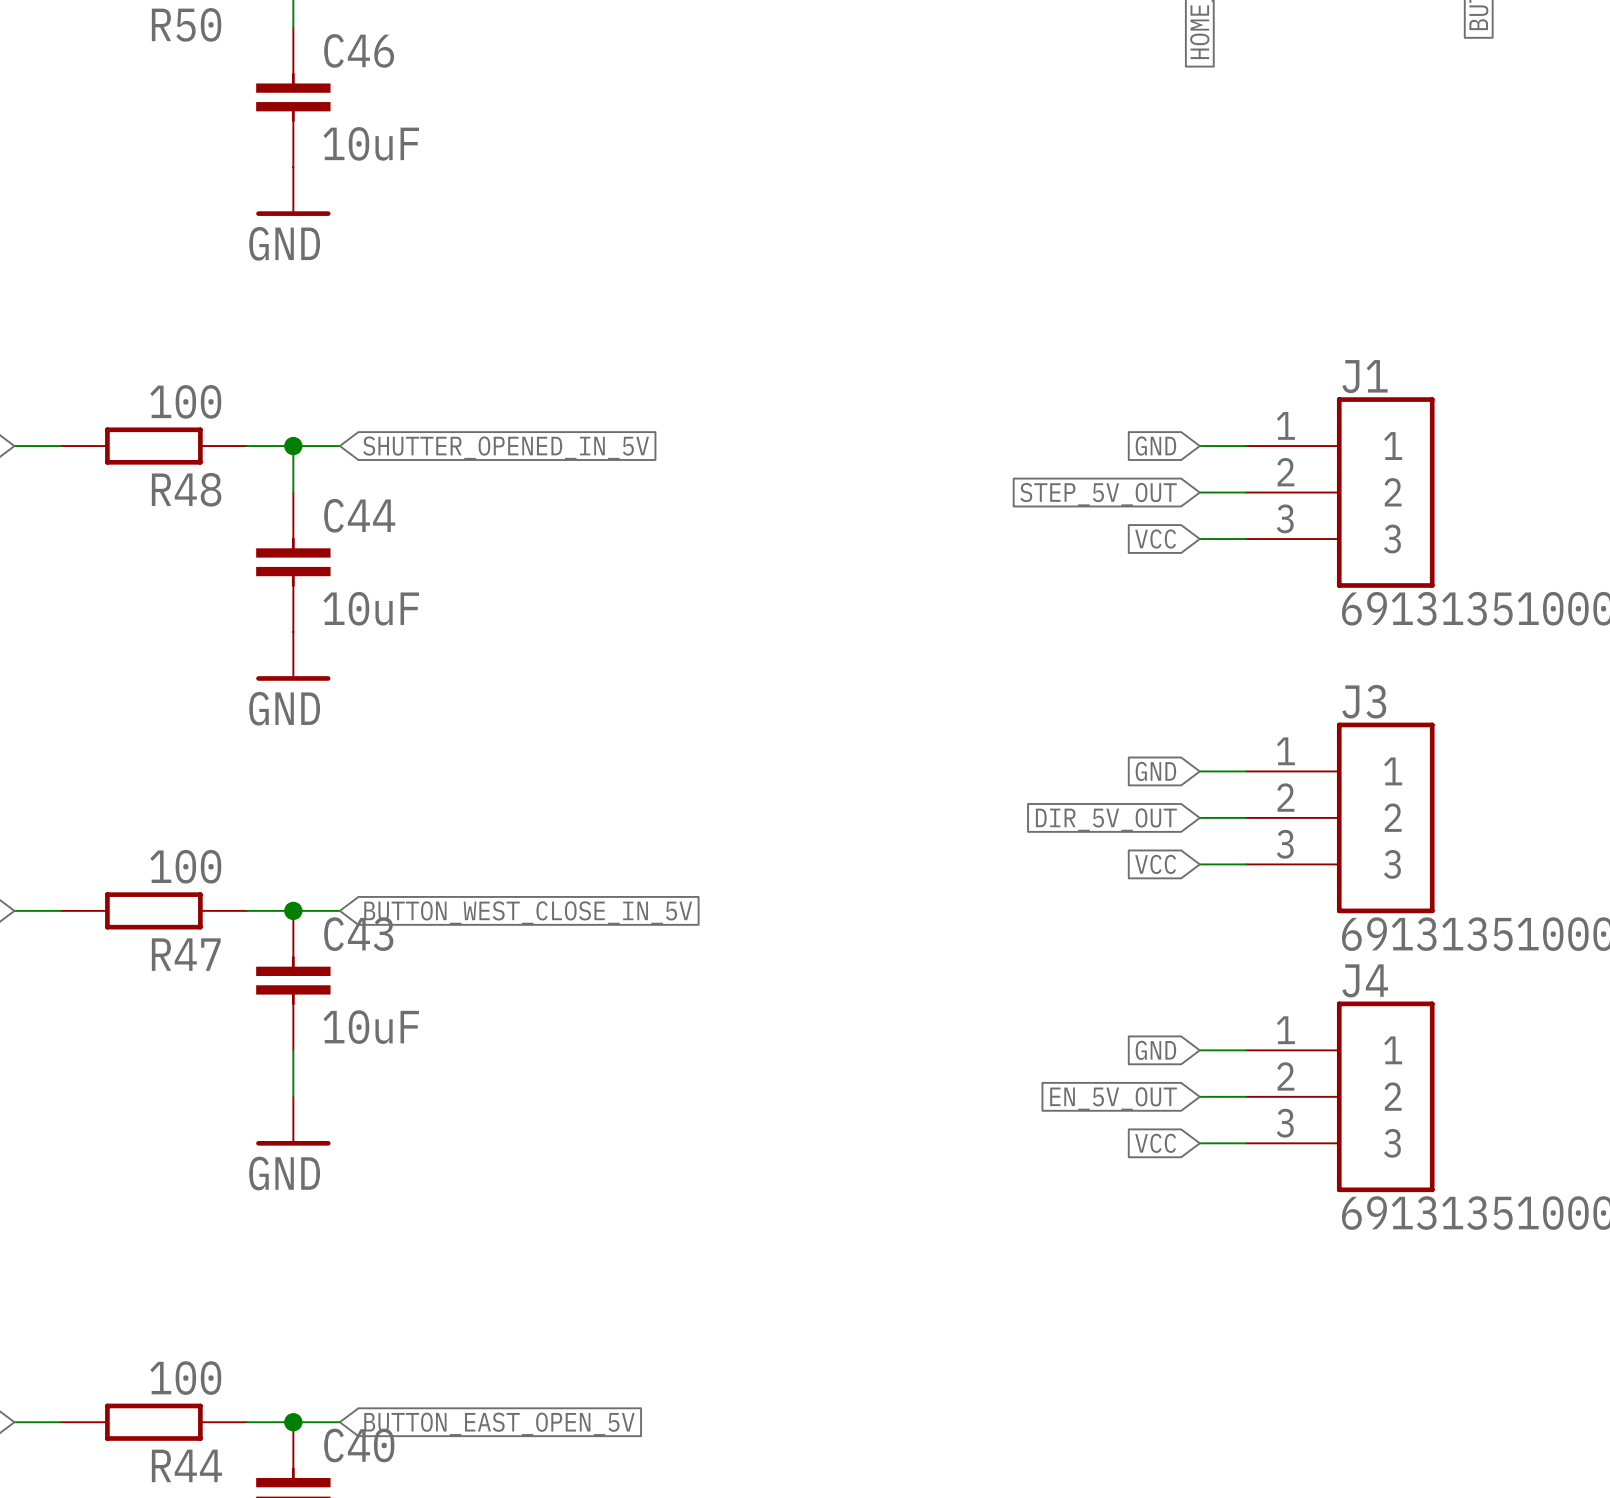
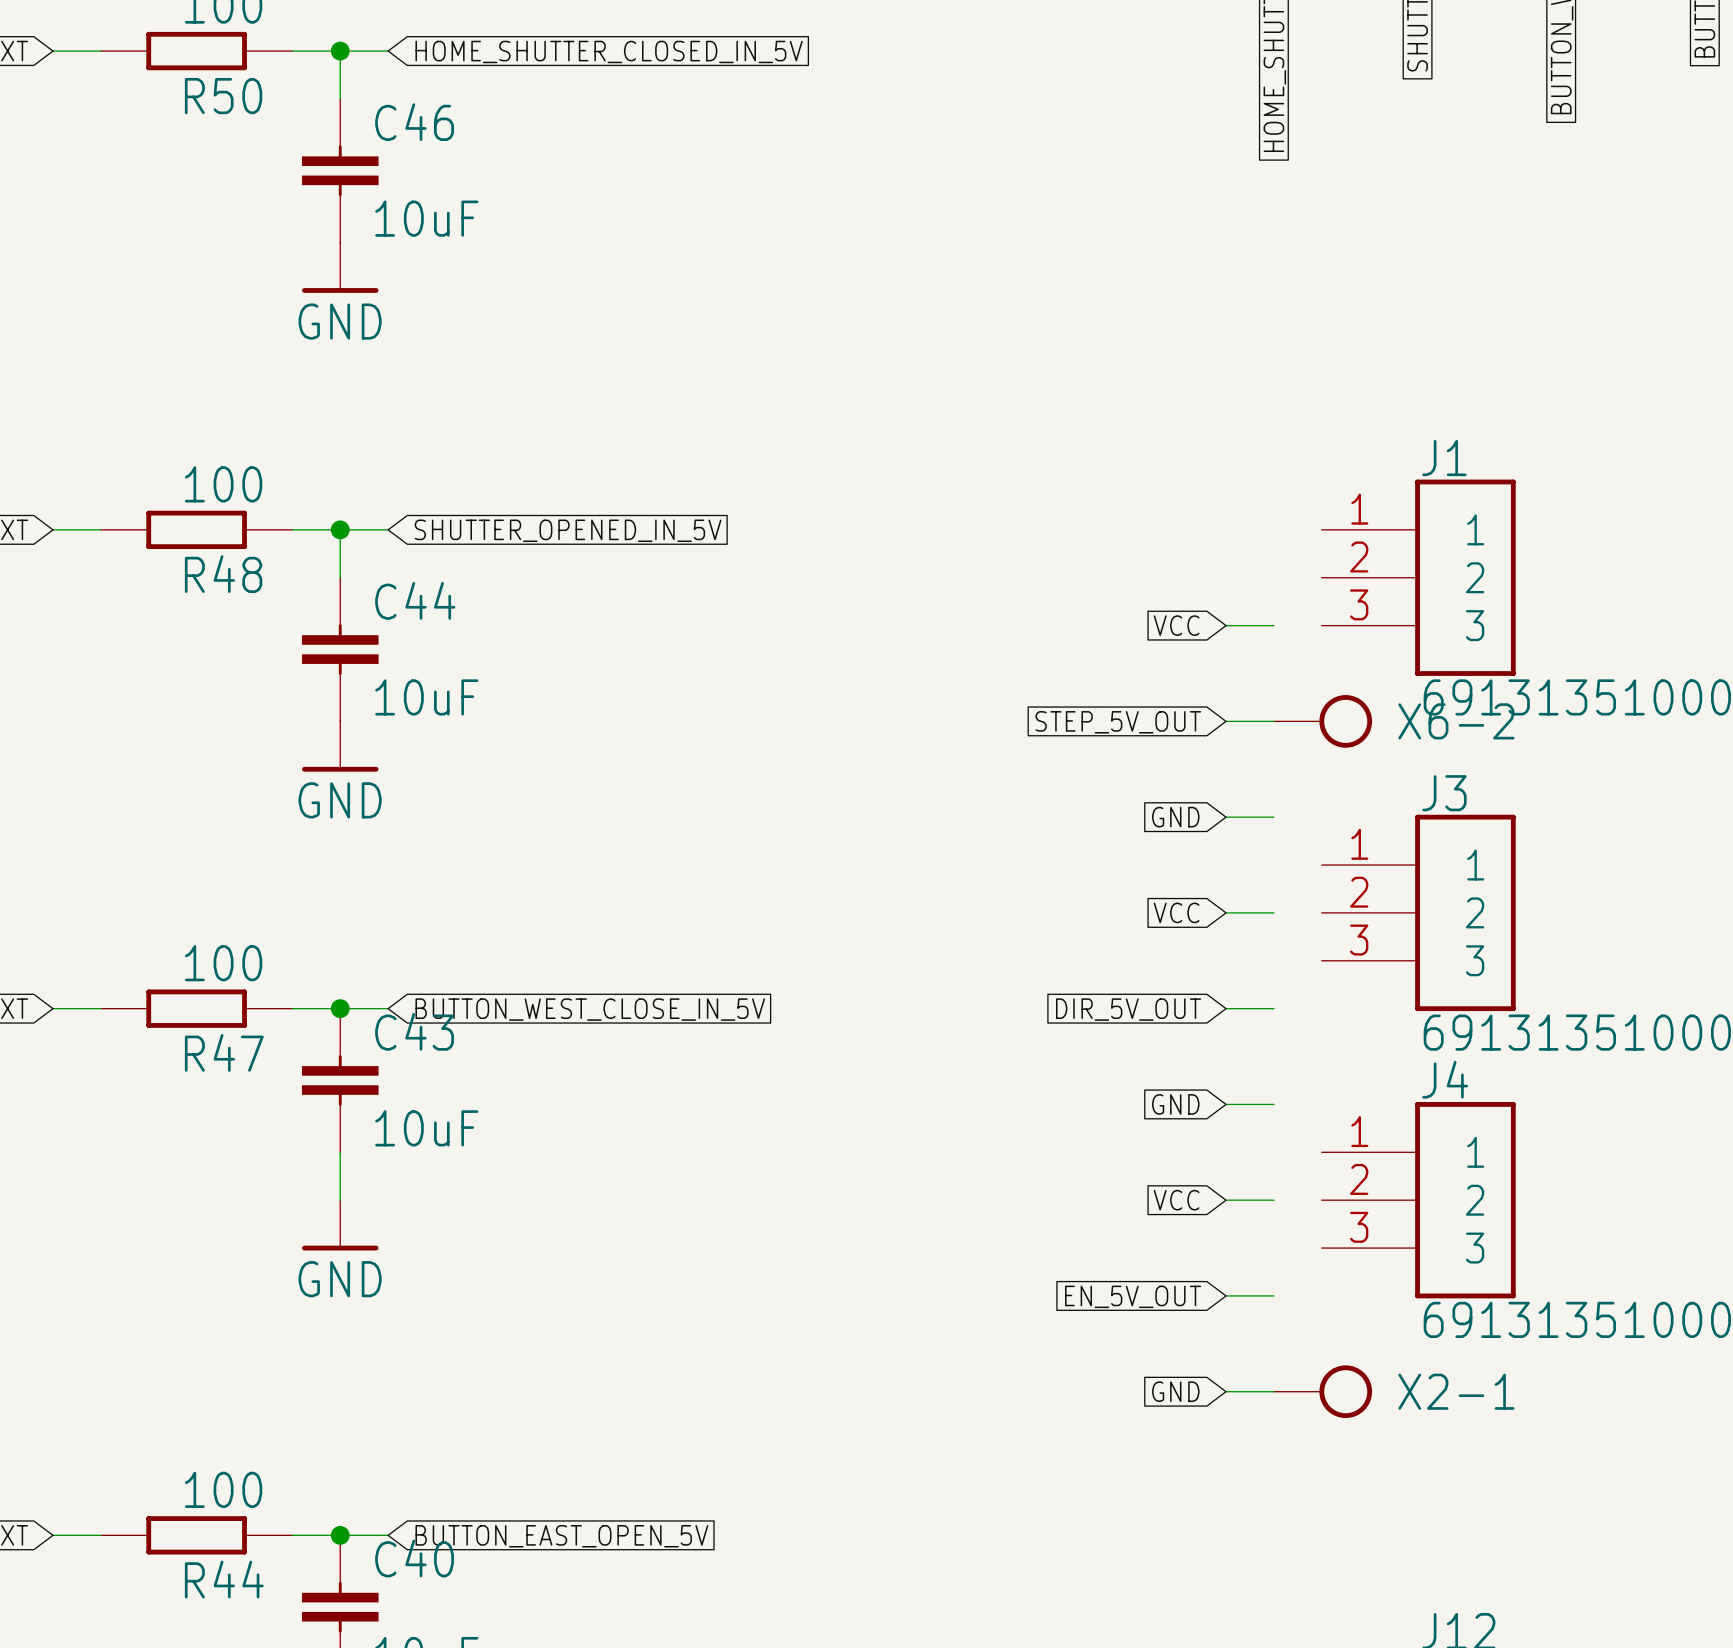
global label: GND (1155, 446) -> none
wire: (1199, 446) (1246, 446) -> none
wire: (1199, 492) (1246, 492) -> (1226, 721) (1273, 721)
global label position: STEP_5V_OUT (1098, 494) -> STEP_5V_OUT (1118, 722)
global label position: VCC (1155, 539) -> VCC (1176, 625)
wire: (1199, 539) (1246, 539) -> (1273, 625) (1226, 625)
X6-2: none -> (1322, 721)
global label position: GND (1155, 771) -> GND (1175, 817)
wire: (1199, 771) (1246, 771) -> (1226, 817) (1273, 817)
wire: (1199, 817) (1246, 817) -> (1273, 912) (1226, 912)
global label position: DIR_5V_OUT (1106, 820) -> DIR_5V_OUT (1128, 1009)
global label position: VCC (1155, 864) -> VCC (1176, 912)
wire: (1199, 864) (1246, 864) -> (1226, 1008) (1273, 1008)
global label position: GND (1155, 1050) -> GND (1175, 1104)
wire: (1199, 1050) (1246, 1050) -> (1226, 1104) (1273, 1104)
wire: (1199, 1096) (1246, 1096) -> (1273, 1200) (1226, 1200)
global label position: EN_5V_OUT (1113, 1098) -> EN_5V_OUT (1133, 1296)
global label position: VCC (1155, 1143) -> VCC (1176, 1200)
wire: (1199, 1143) (1246, 1143) -> (1226, 1295) (1273, 1295)
global label: none -> GND (1175, 1391)
wire: none -> (1226, 1391) (1273, 1391)
X2-1: none -> (1322, 1391)

